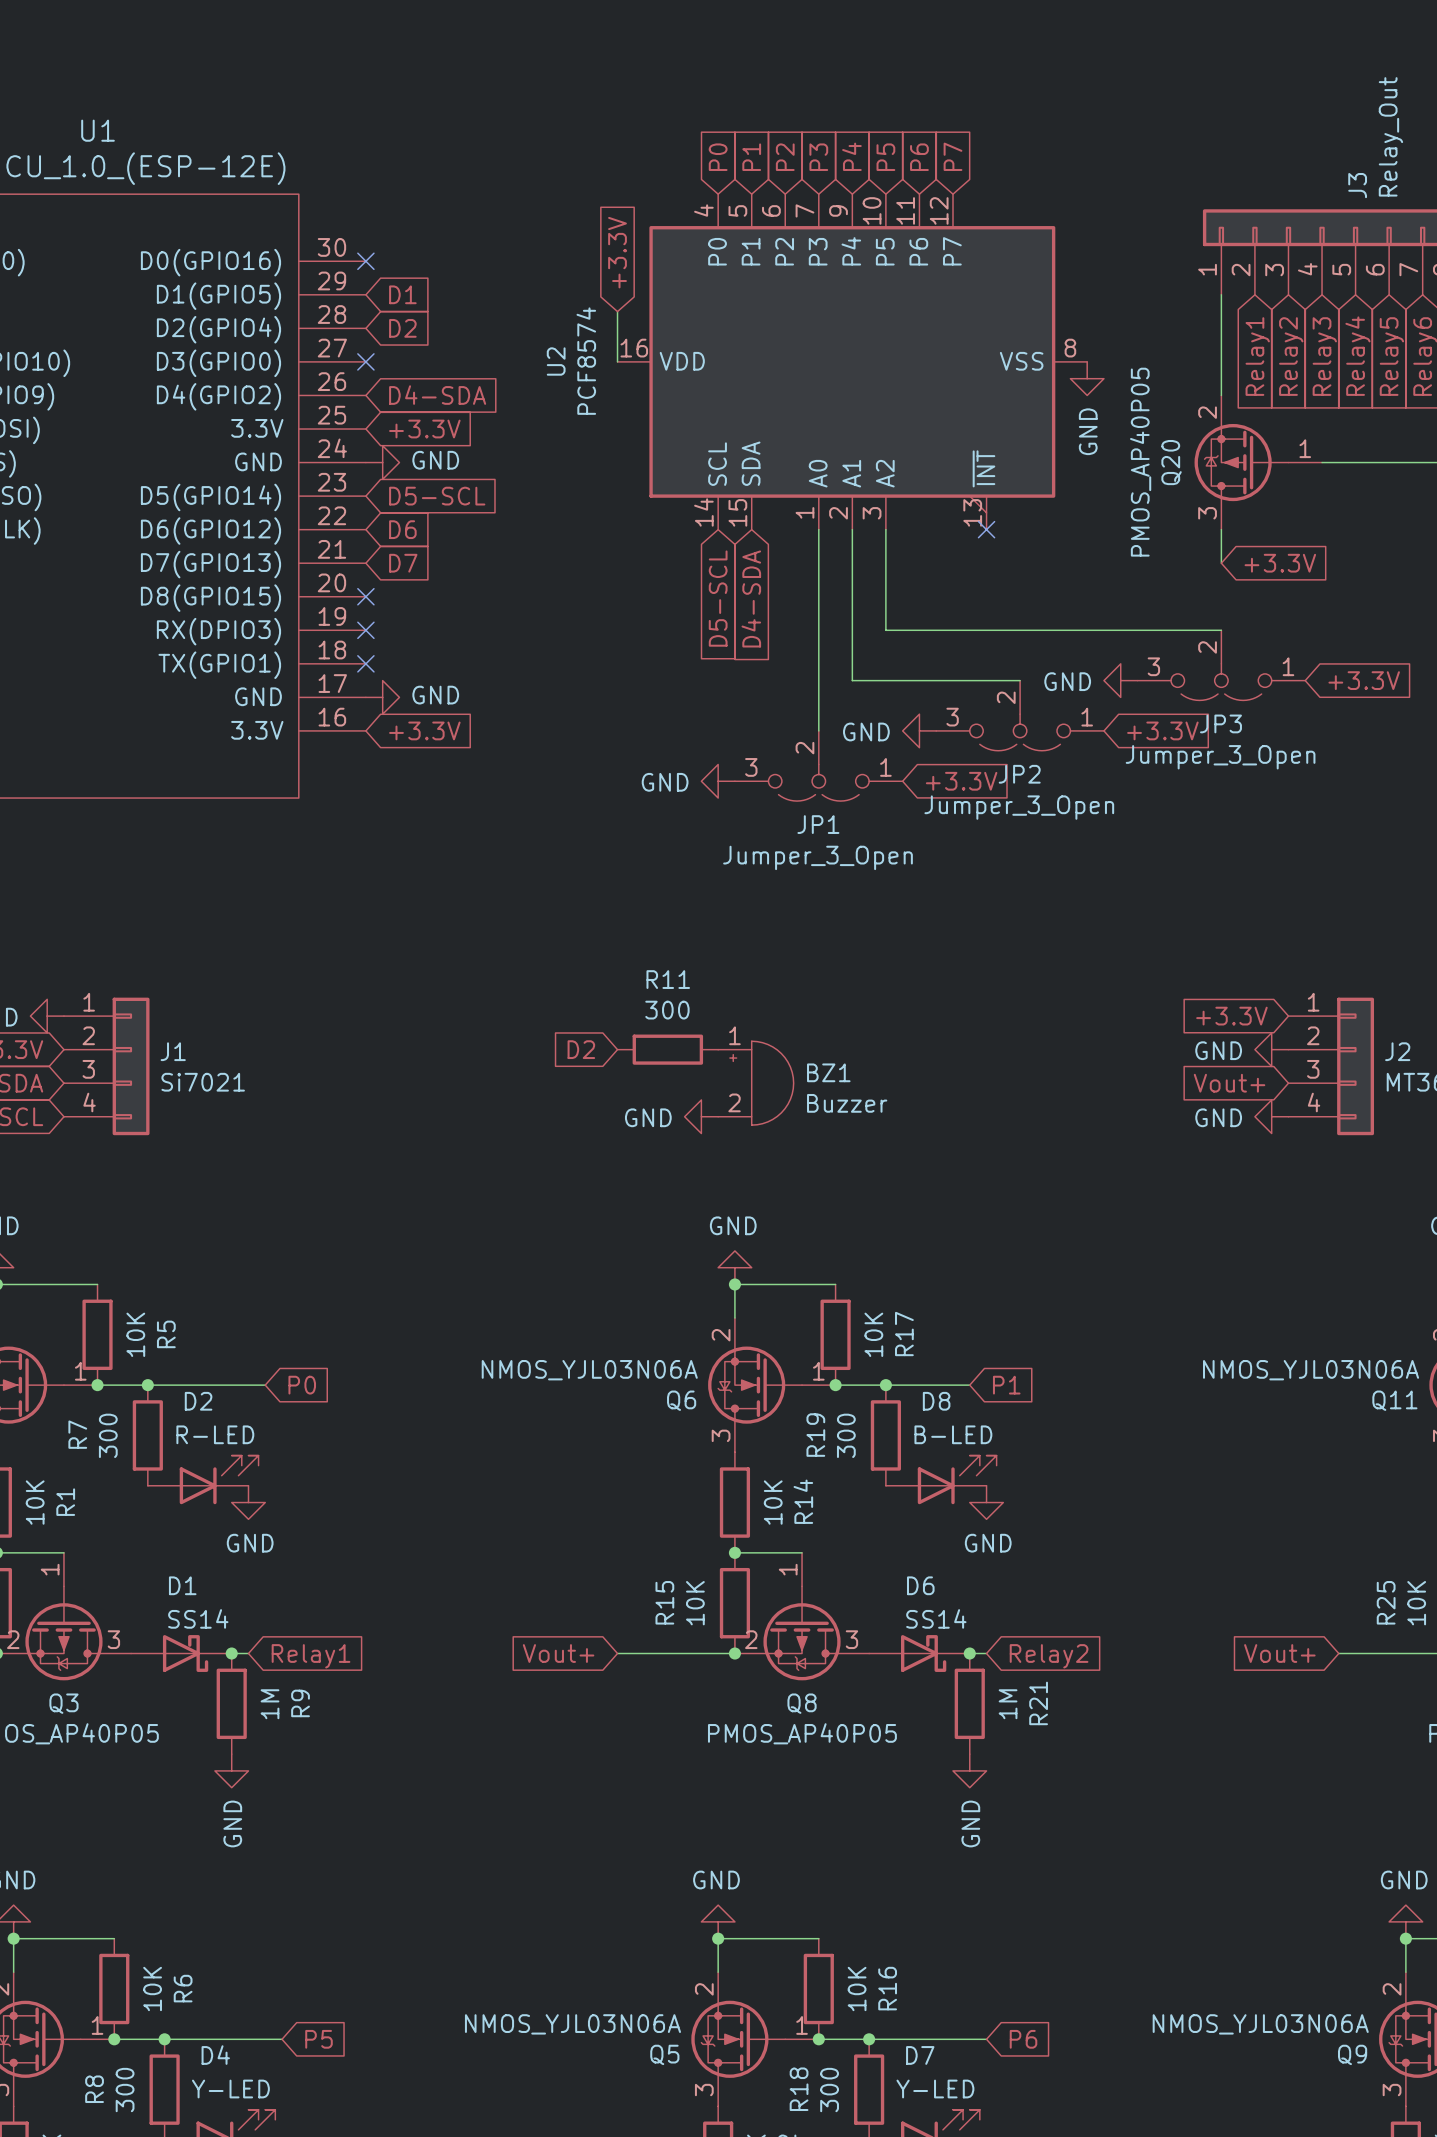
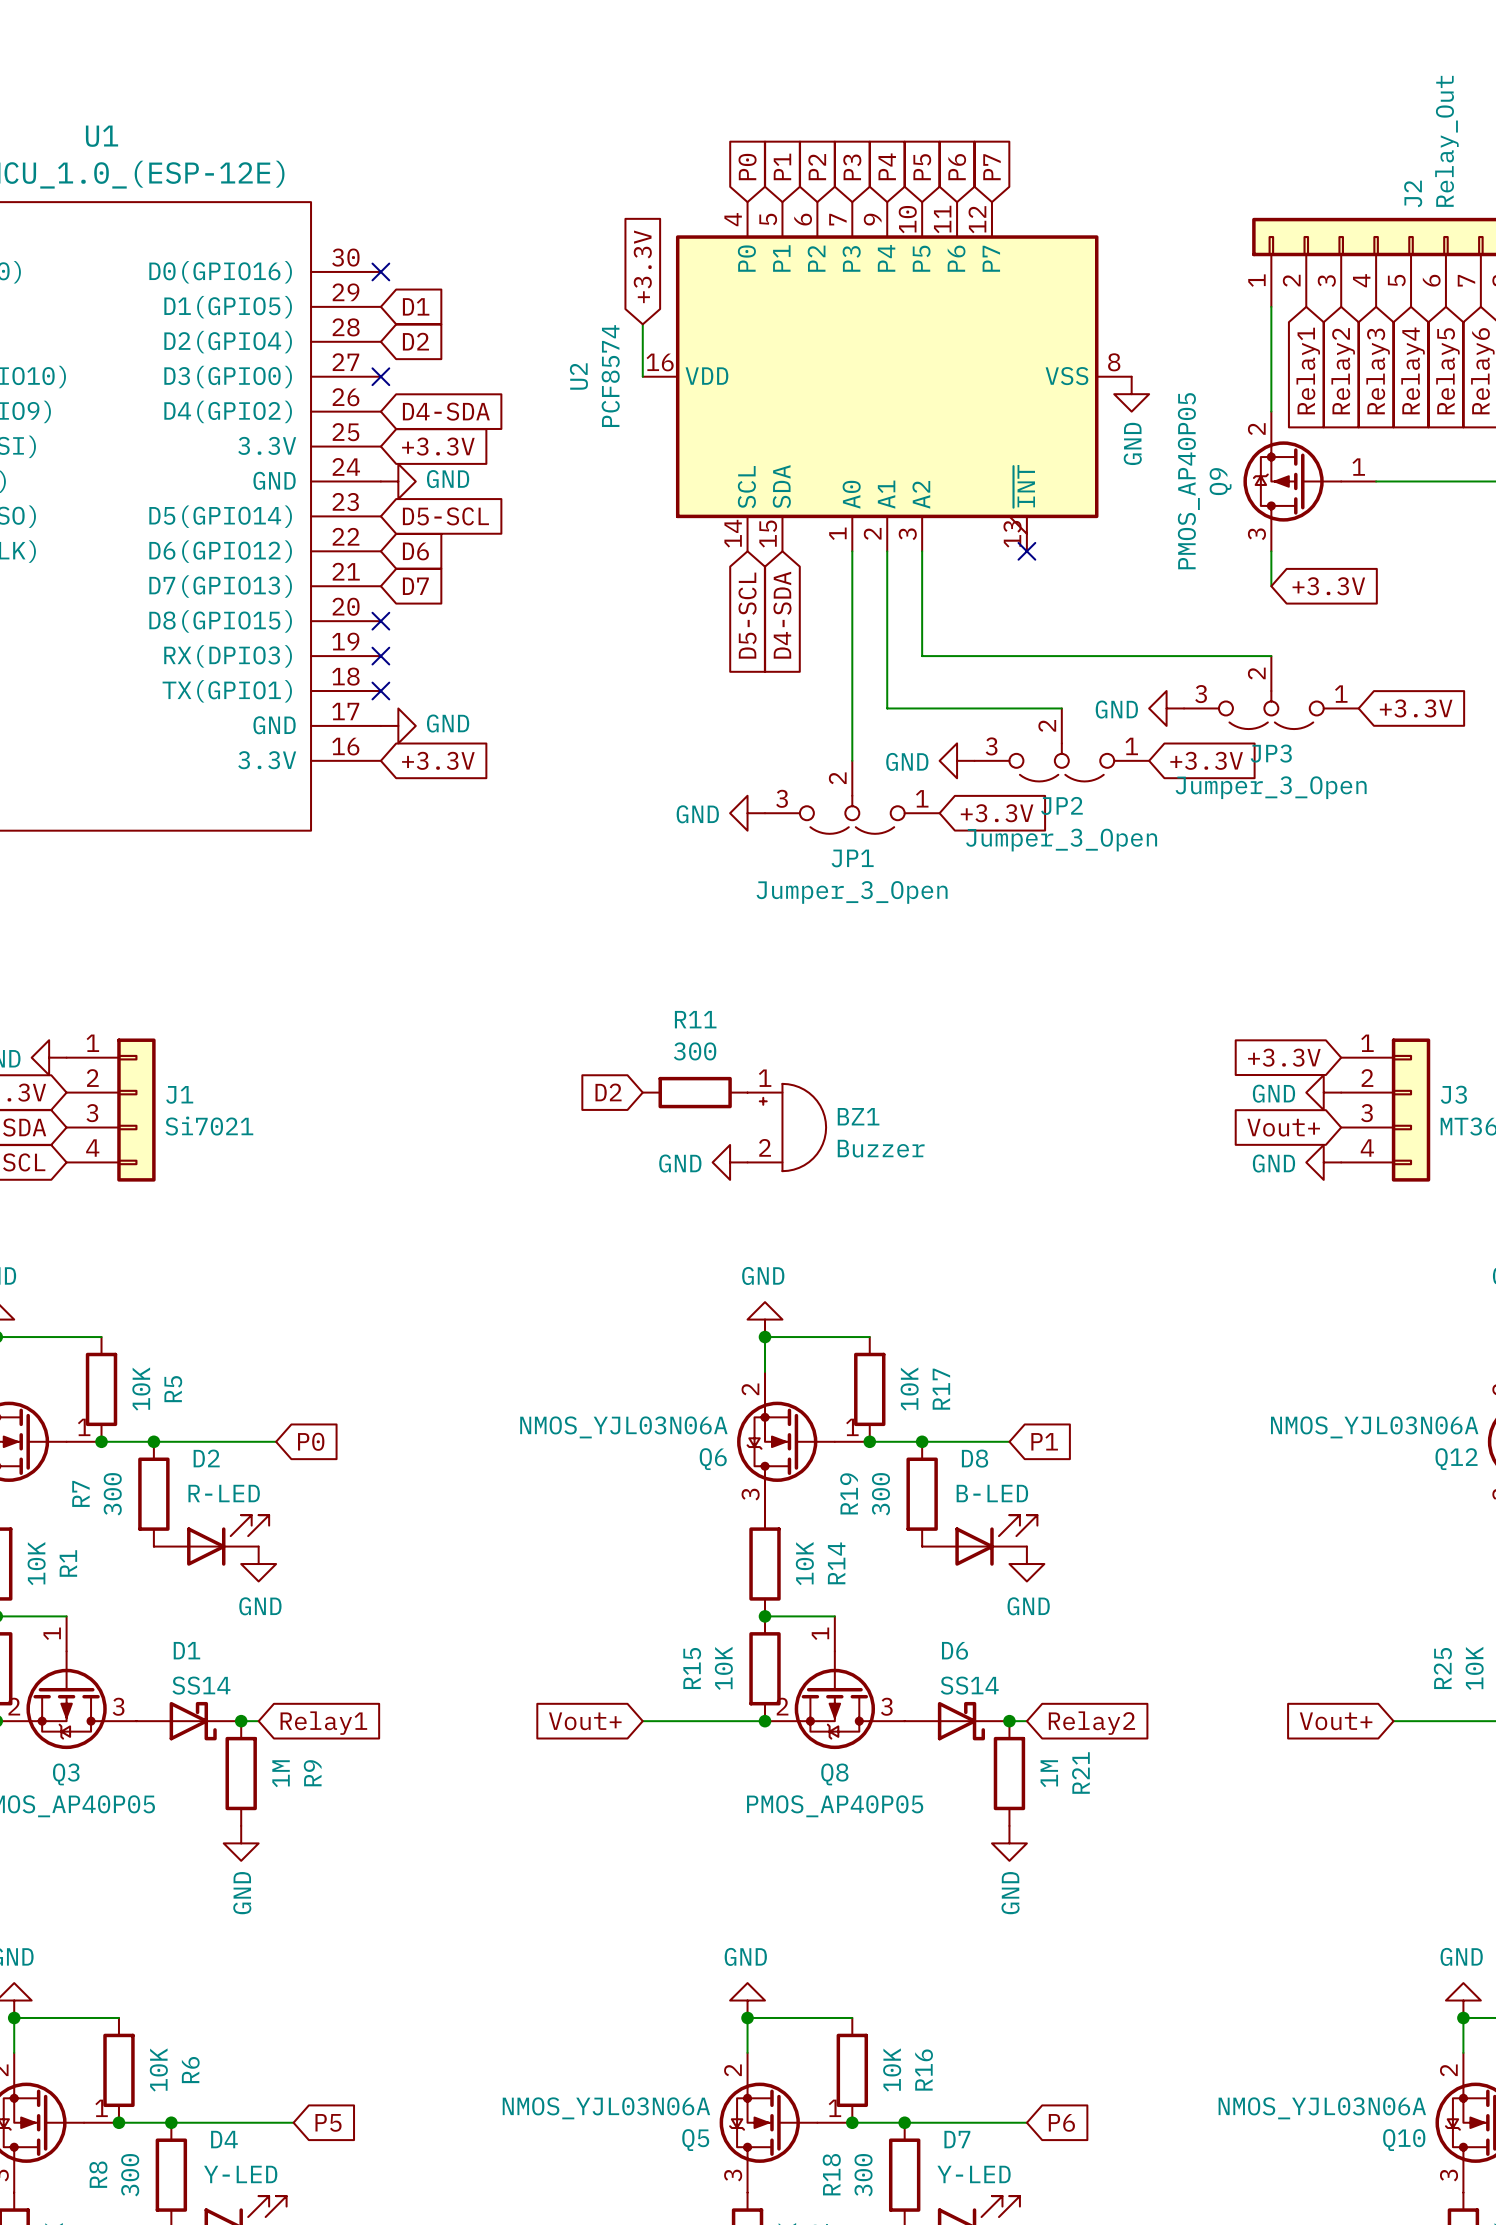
J3 name: J3 (1357, 185) -> J2 (1413, 193)
Q20 name: Q20 (1171, 462) -> Q9 (1220, 481)
J2 name: J2 (1397, 1051) -> J3 (1453, 1094)
Q11 name: Q11 (1394, 1400) -> Q12 (1456, 1459)
Q9 name: Q9 (1352, 2054) -> Q10 (1404, 2140)

